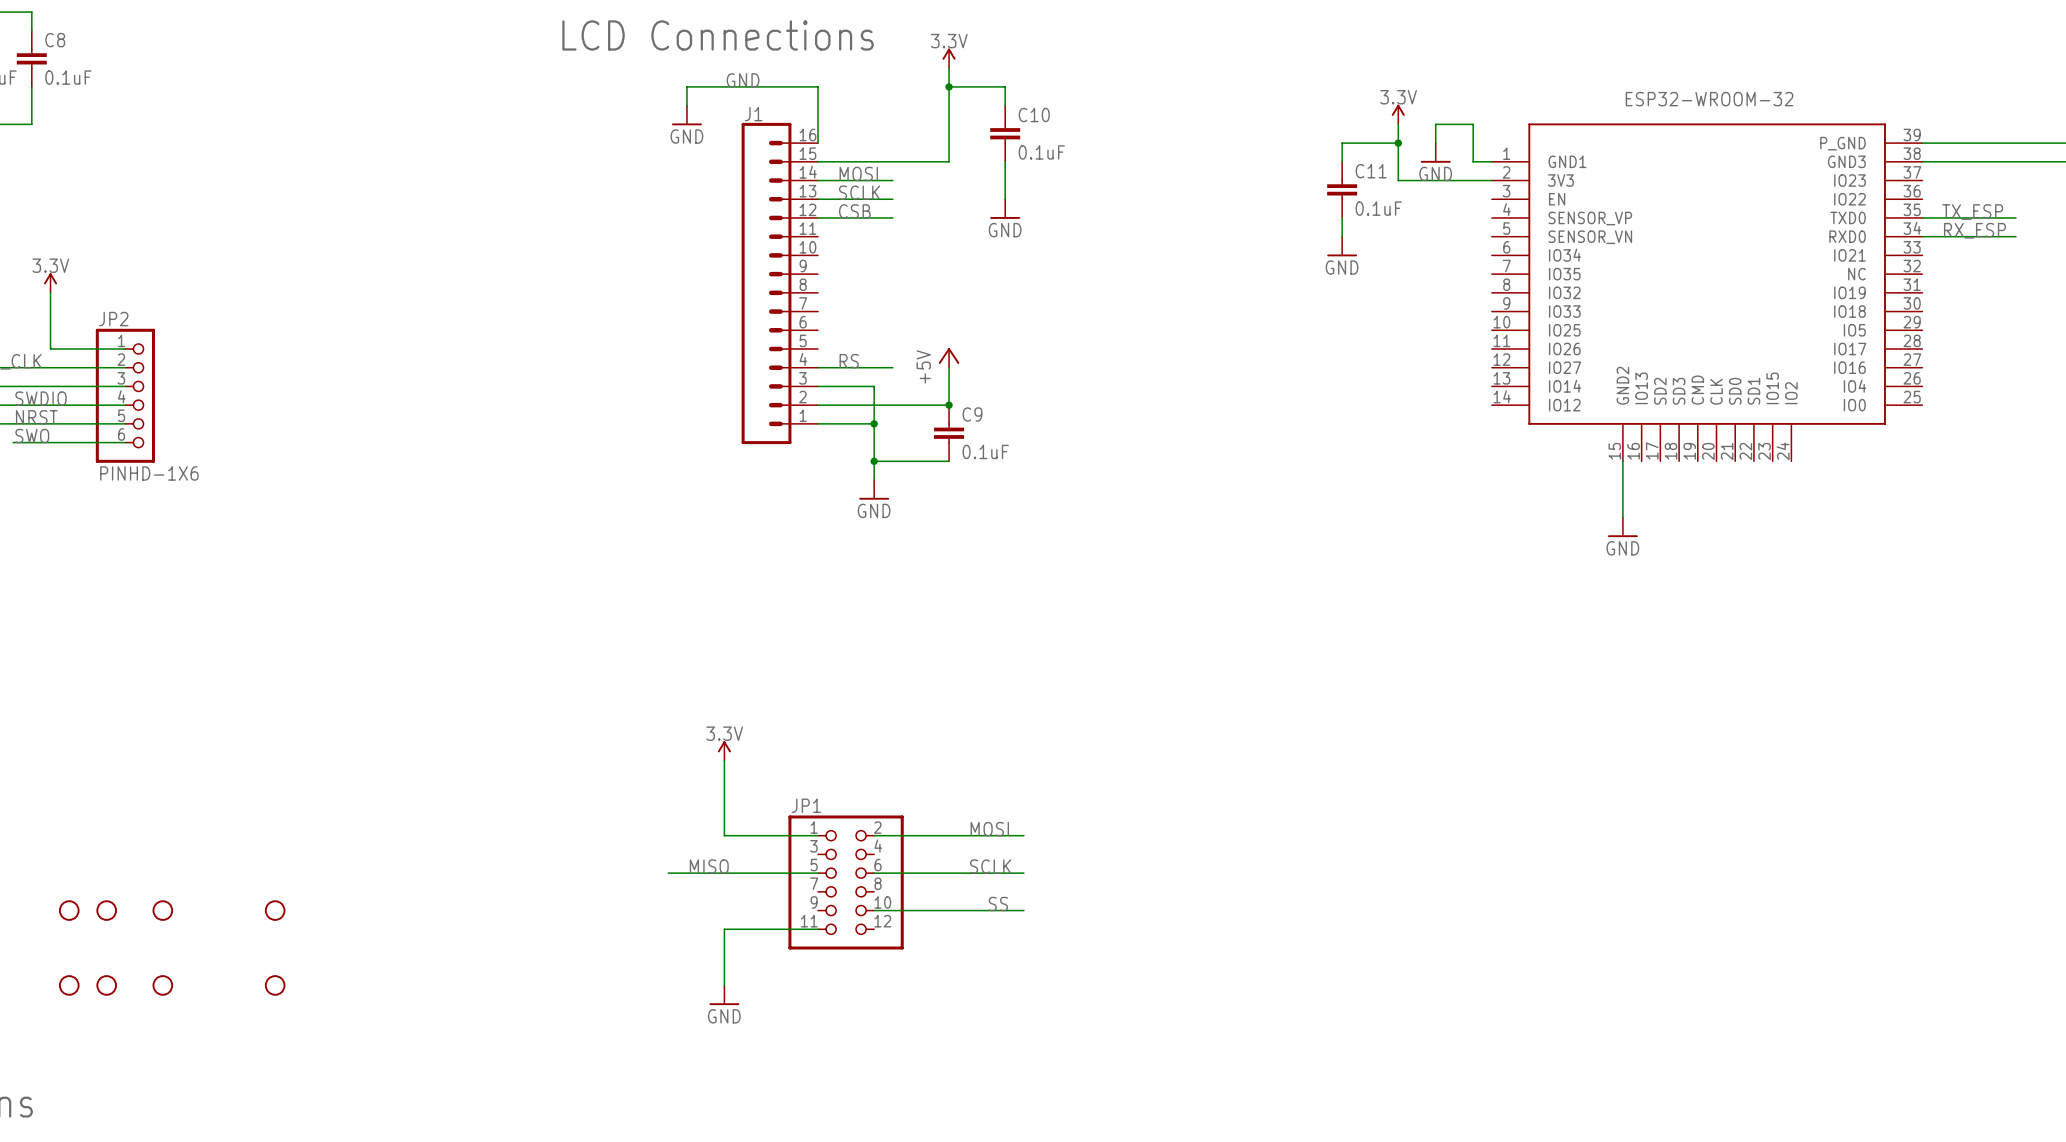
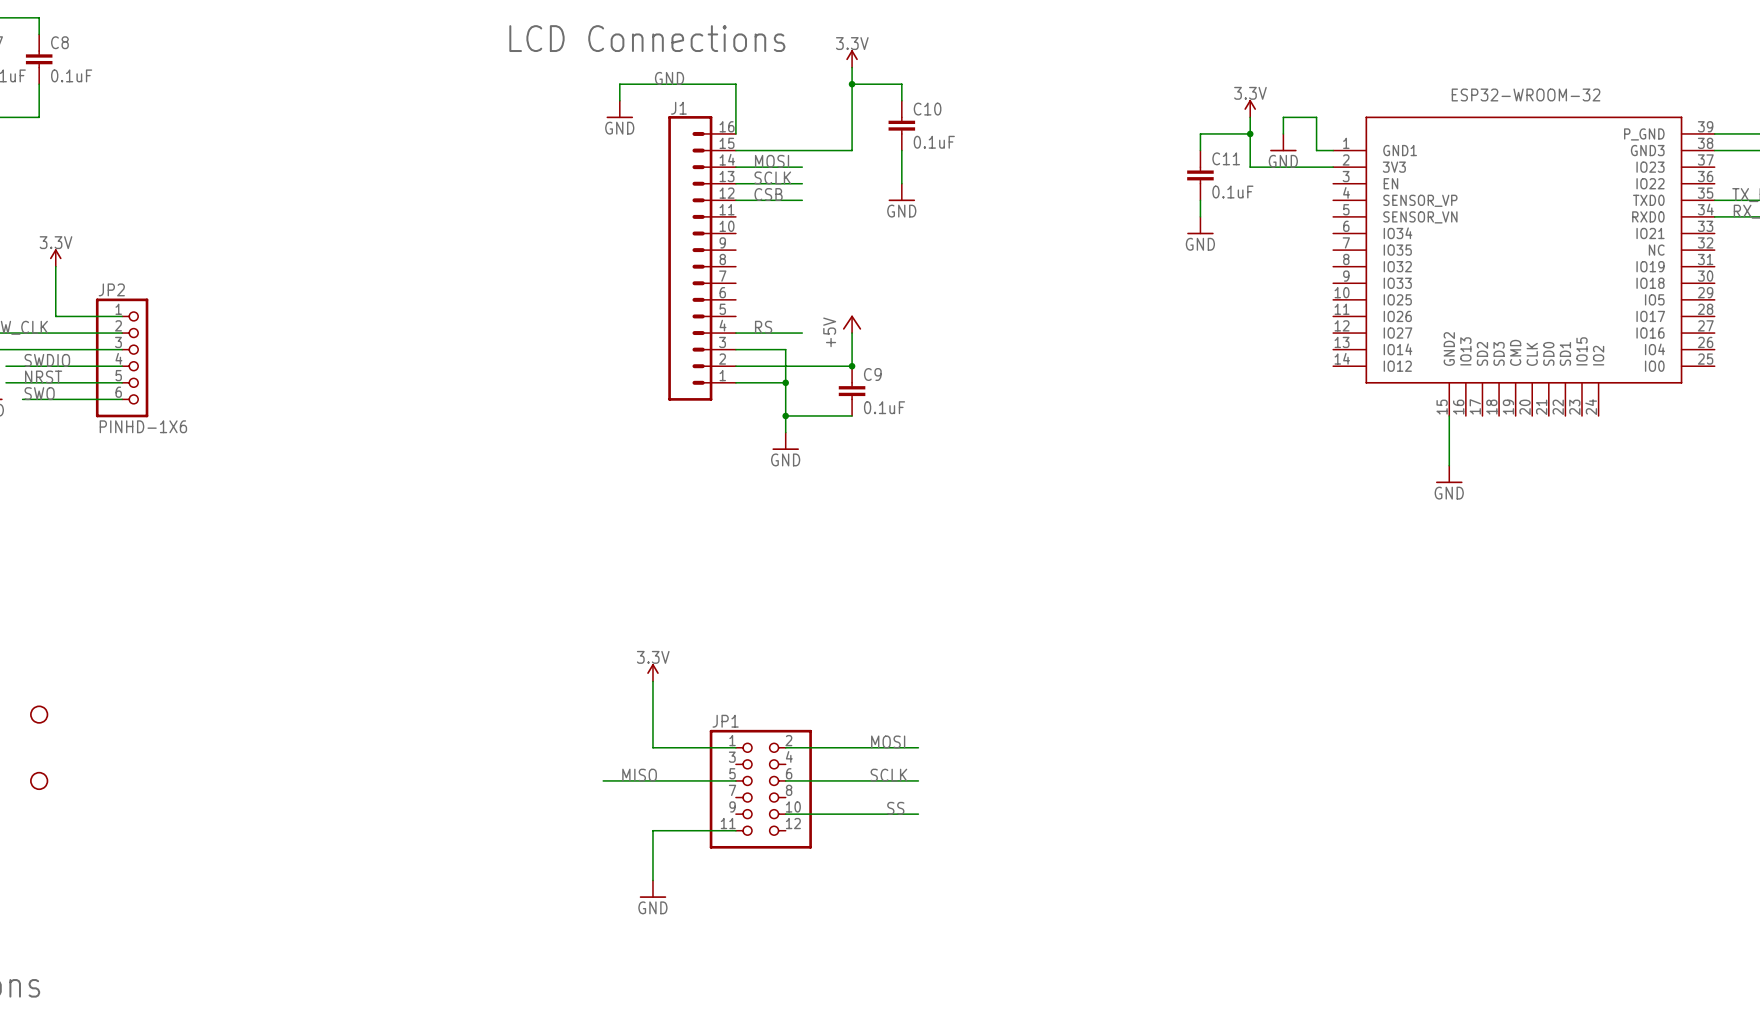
part: none -> (39, 714)
part: none -> (39, 780)
part: (69, 910) -> none
part: (106, 910) -> none
part: (162, 910) -> none
part: (275, 910) -> none
part: (69, 985) -> none
part: (106, 985) -> none
part: (162, 985) -> none
part: (275, 985) -> none

